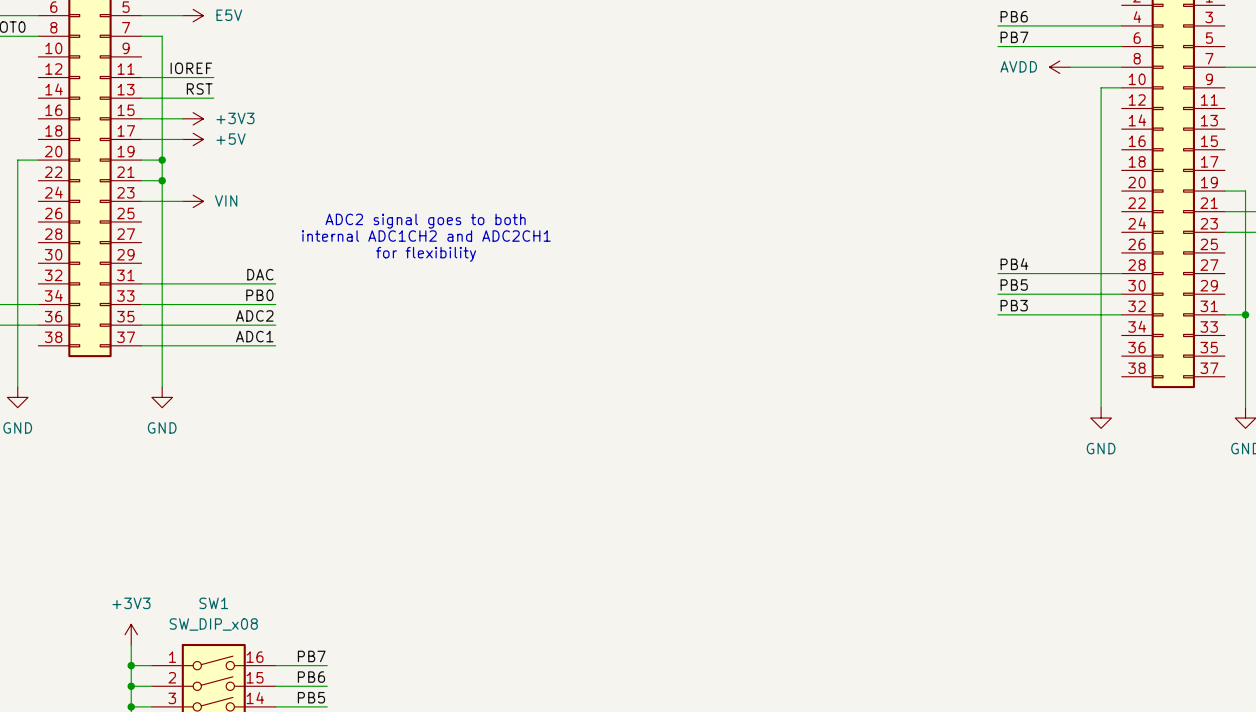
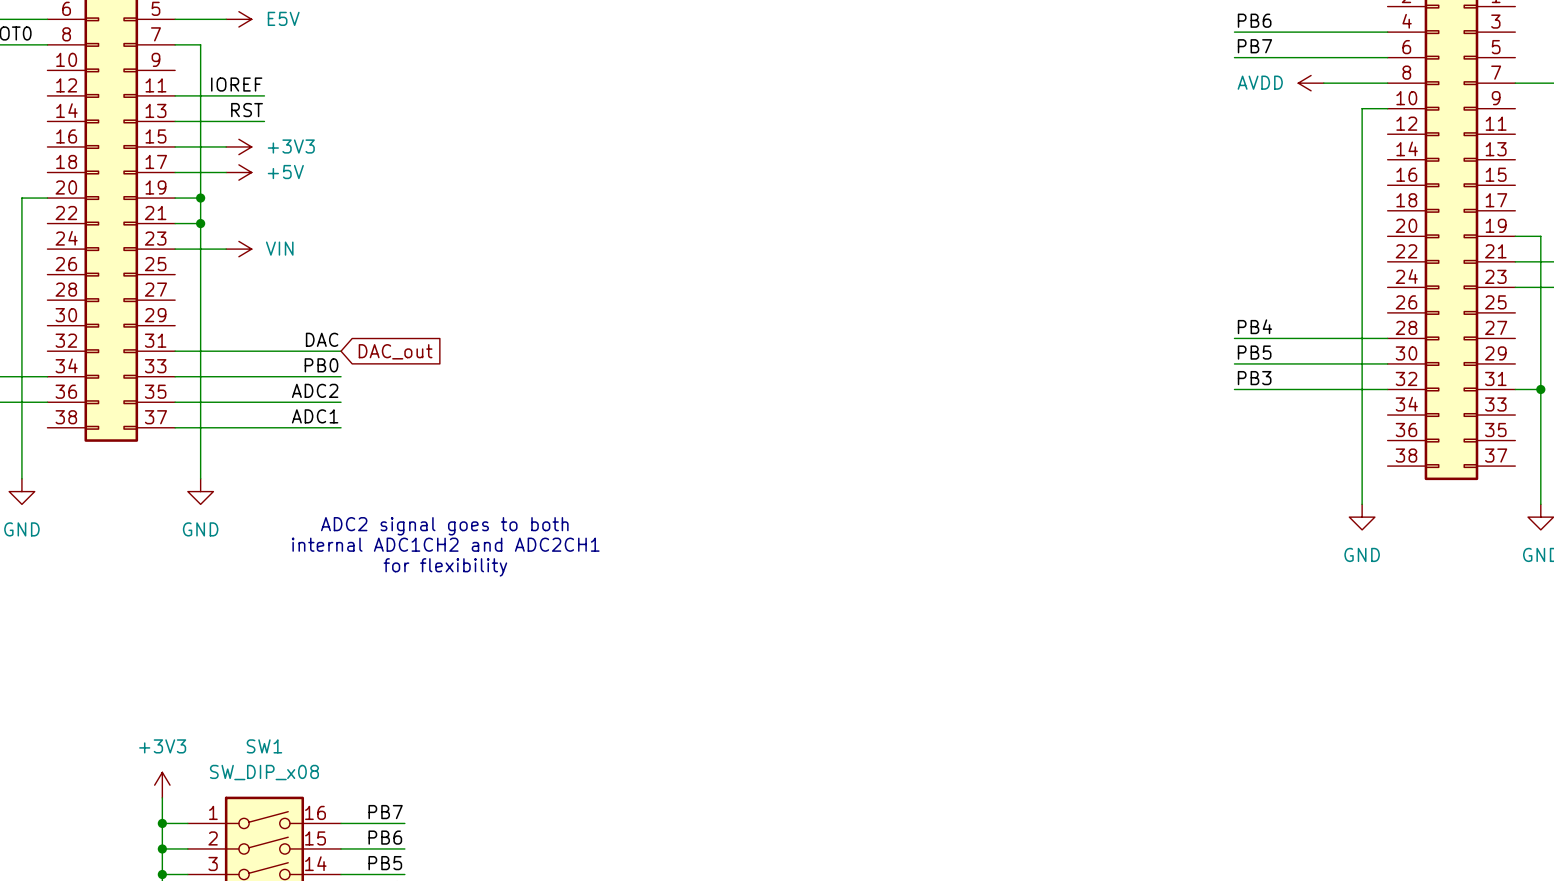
text: ADC2 signal goes to both (425, 221) -> none
text: internal ADC1CH2 and ADC2CH1 (426, 236) -> none
text: for flexibility (426, 254) -> none
global label: none -> DAC_out (395, 351)
text: none -> ADC2 signal goes to both (444, 526)
text: none -> internal ADC1CH2 and ADC2CH1 (445, 544)
text: none -> for flexibility (445, 567)

